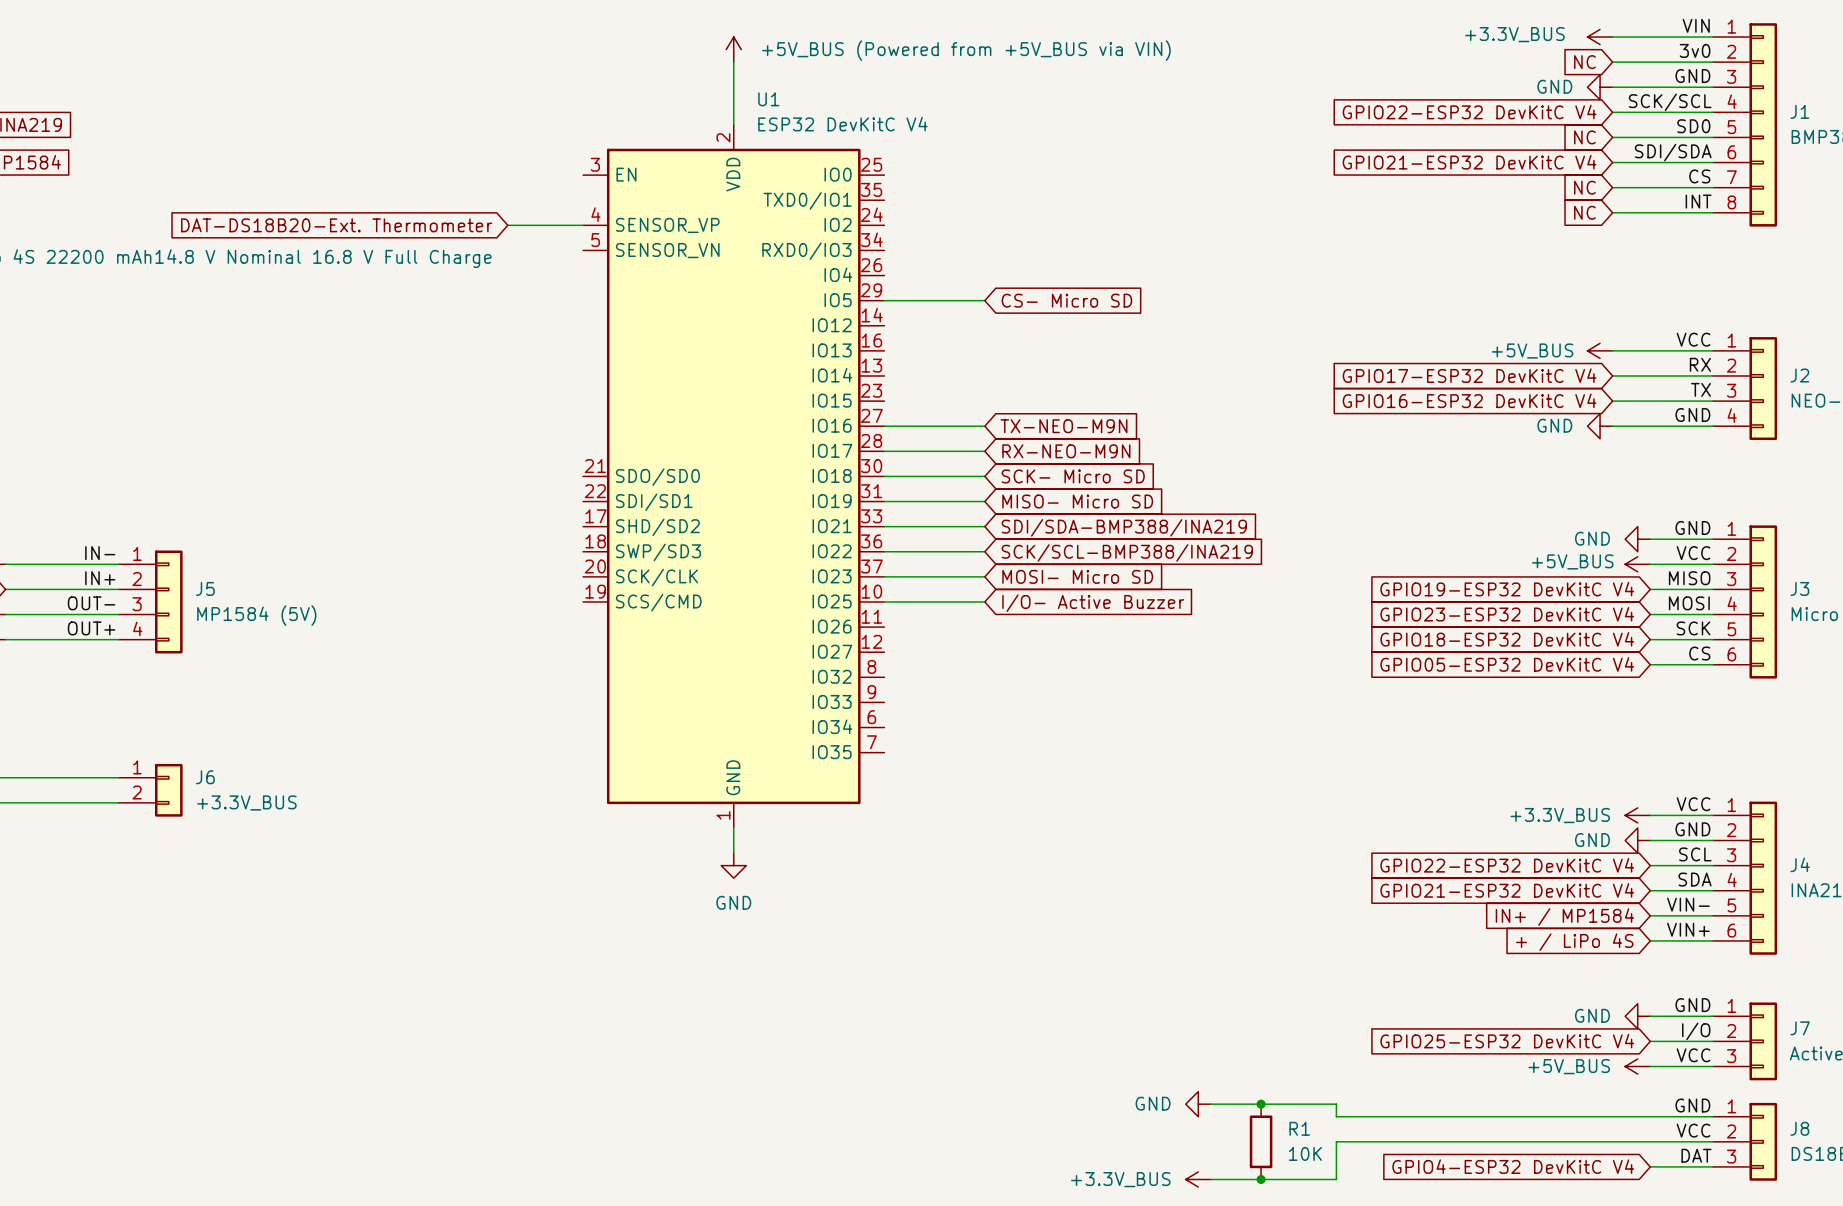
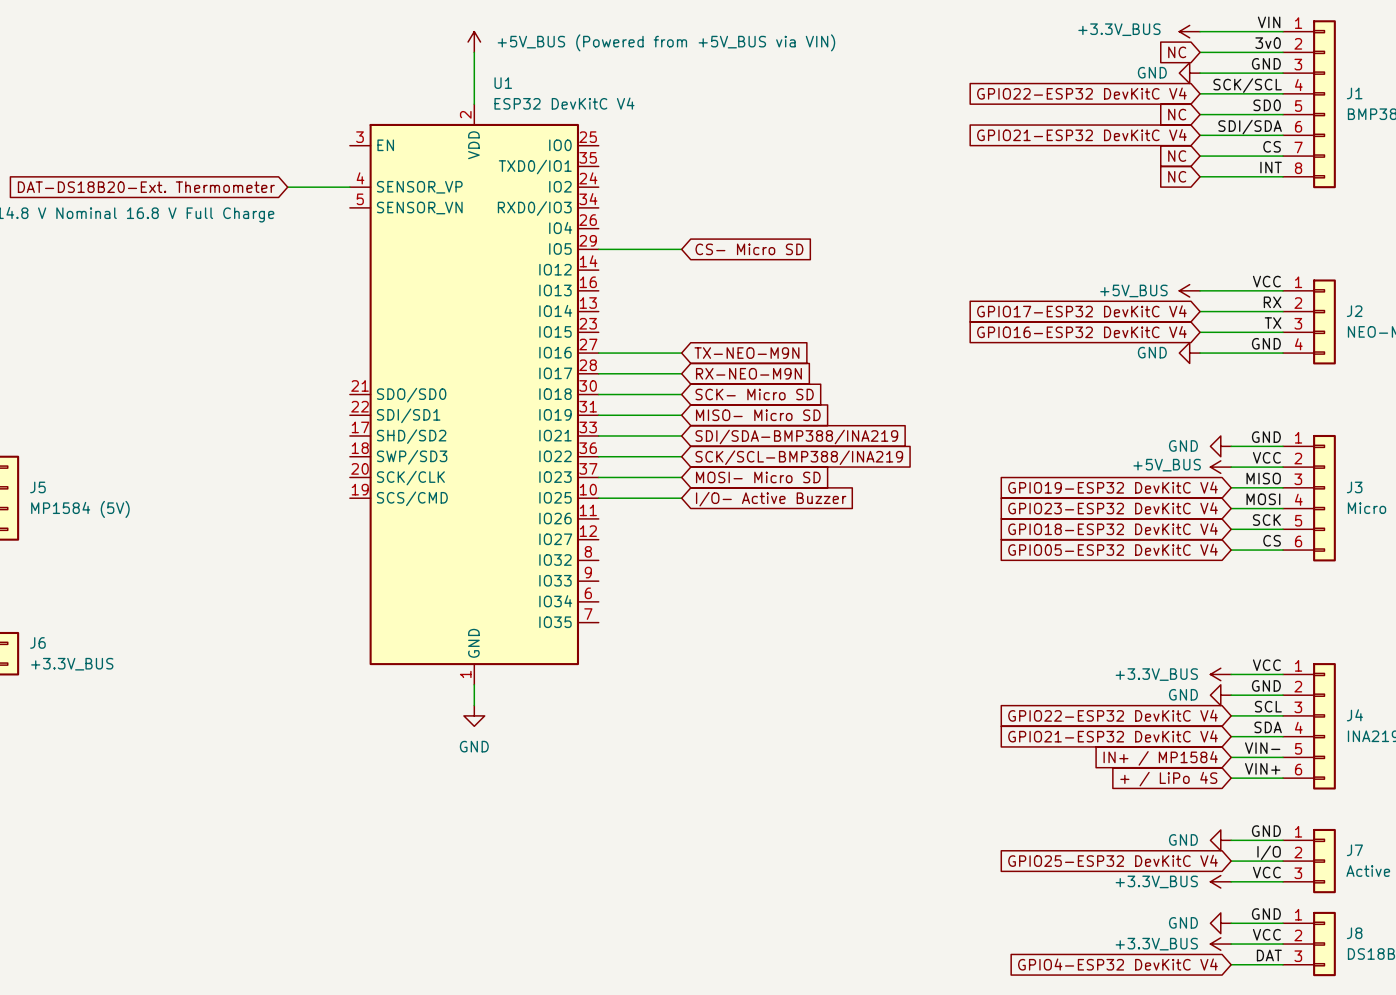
power symbol: +5V_BUS (1637, 1066) -> +3.3V_BUS (1220, 881)
power symbol: GND (1198, 1104) -> none
wire: (1210, 1104) (1336, 1104) (1336, 1116) (1650, 1116) -> none
junction: (1261, 1104) -> none
power symbol: none -> GND (1220, 923)
R1: 10K (1261, 1141) -> none
power symbol: none -> +3.3V_BUS (1220, 944)
wire: (1650, 1141) (1336, 1141) (1336, 1179) (1210, 1179) -> none
power symbol: +3.3V_BUS (1198, 1179) -> none
junction: (1261, 1179) -> none

